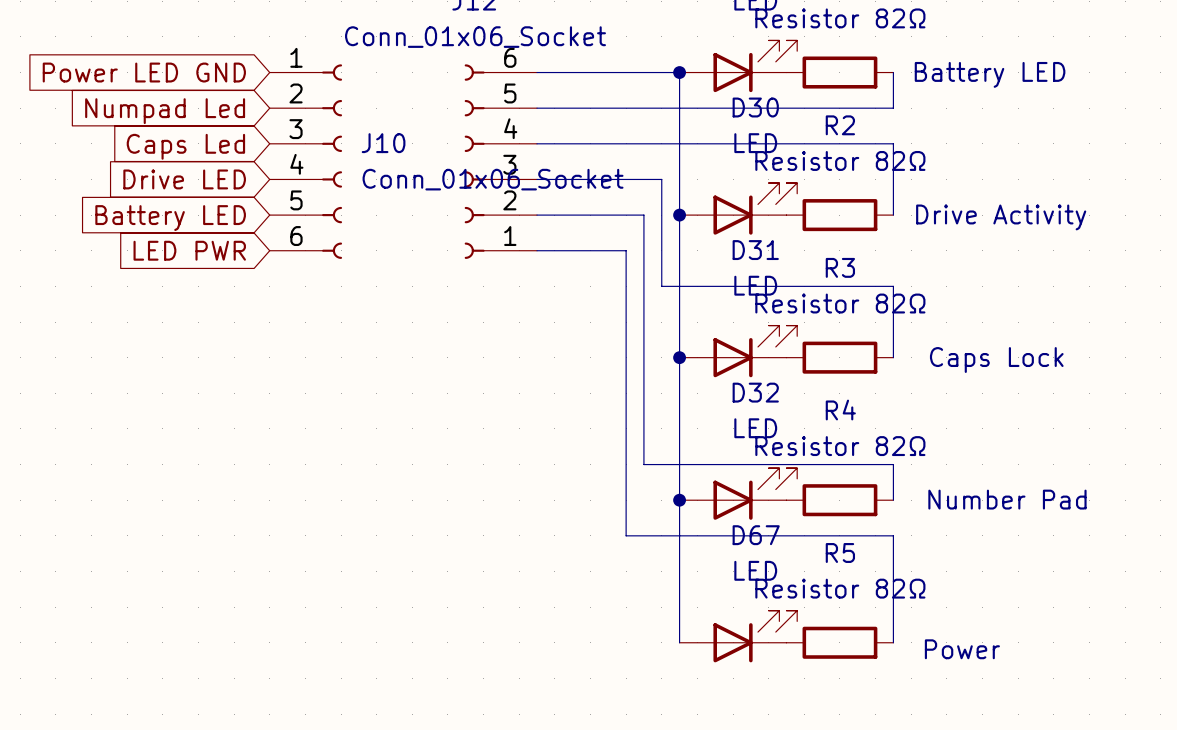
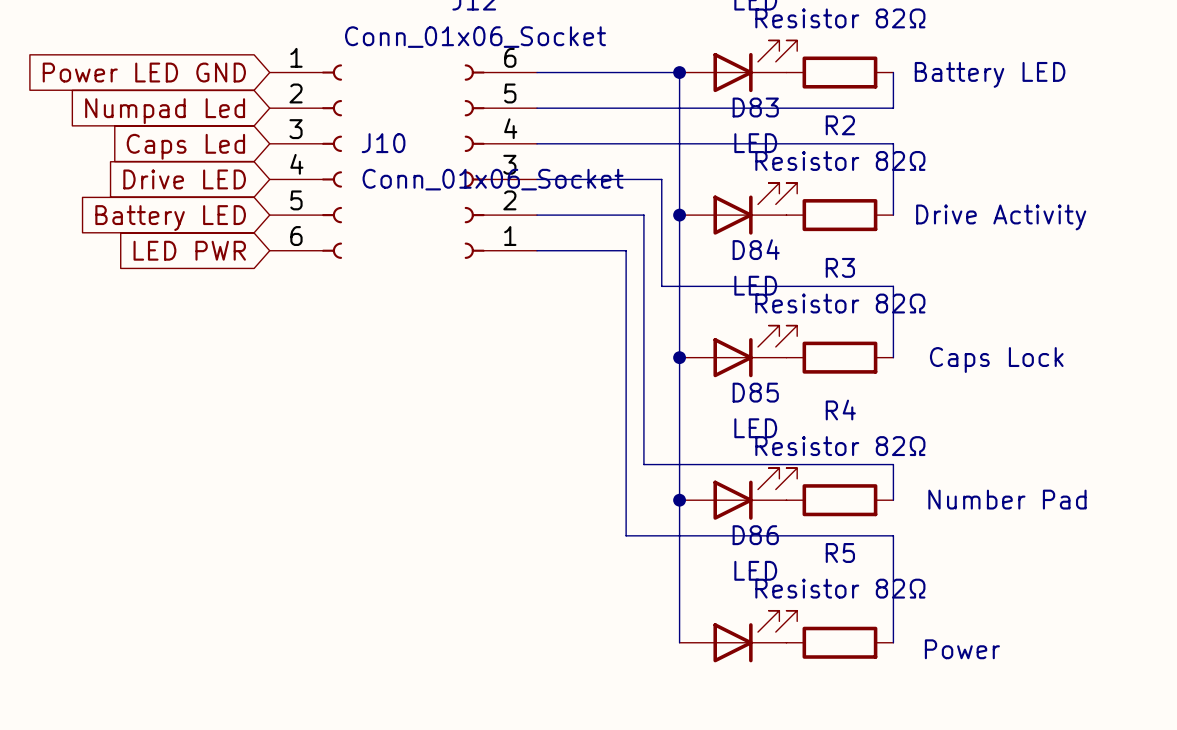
D30 name: D30 (755, 107) -> D83 (755, 107)
D31 name: D31 (755, 250) -> D84 (756, 249)
D32 name: D32 (755, 392) -> D85 (755, 392)
D67 name: D67 (756, 535) -> D86 (755, 535)

